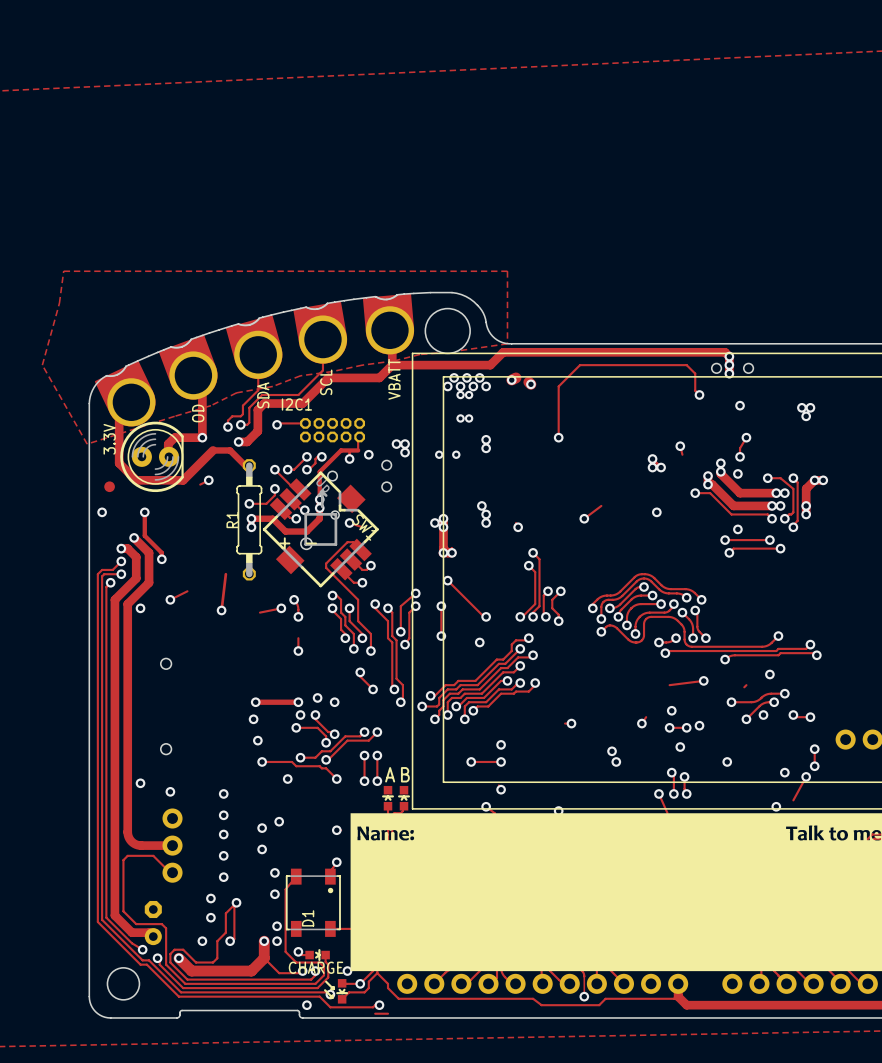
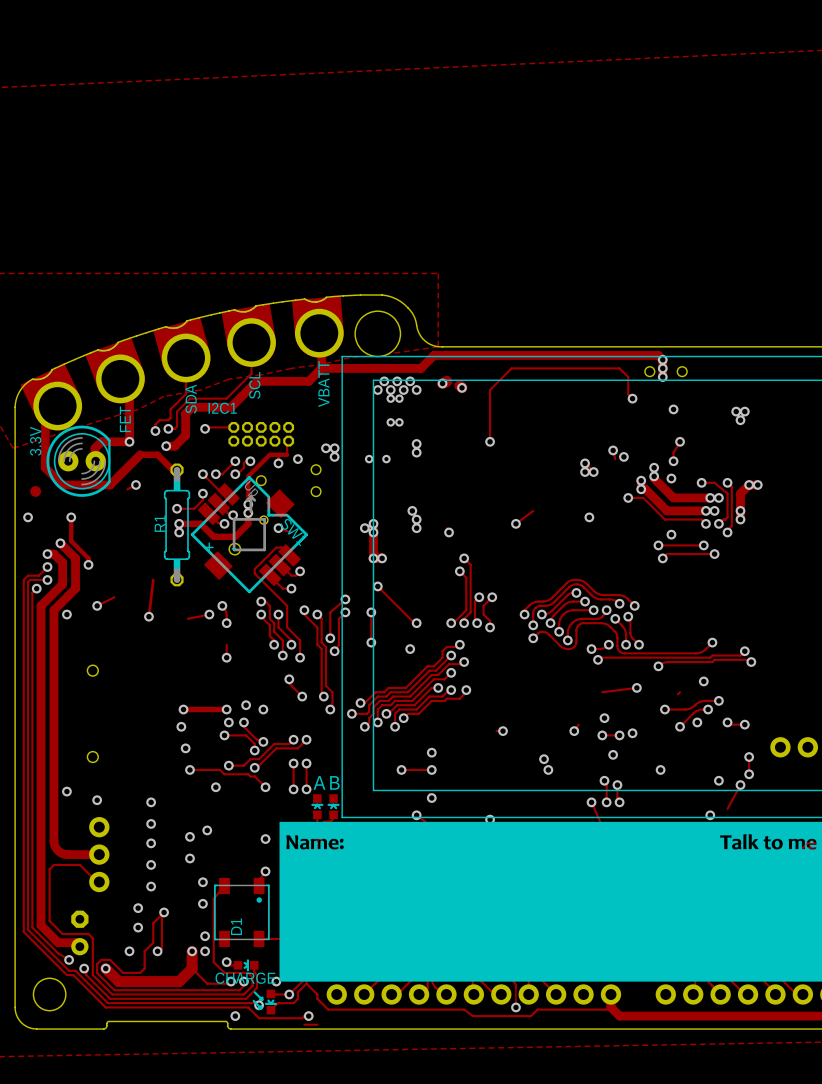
text: OD (198, 413) -> FET (125, 419)
via: none -> (623, 456)

